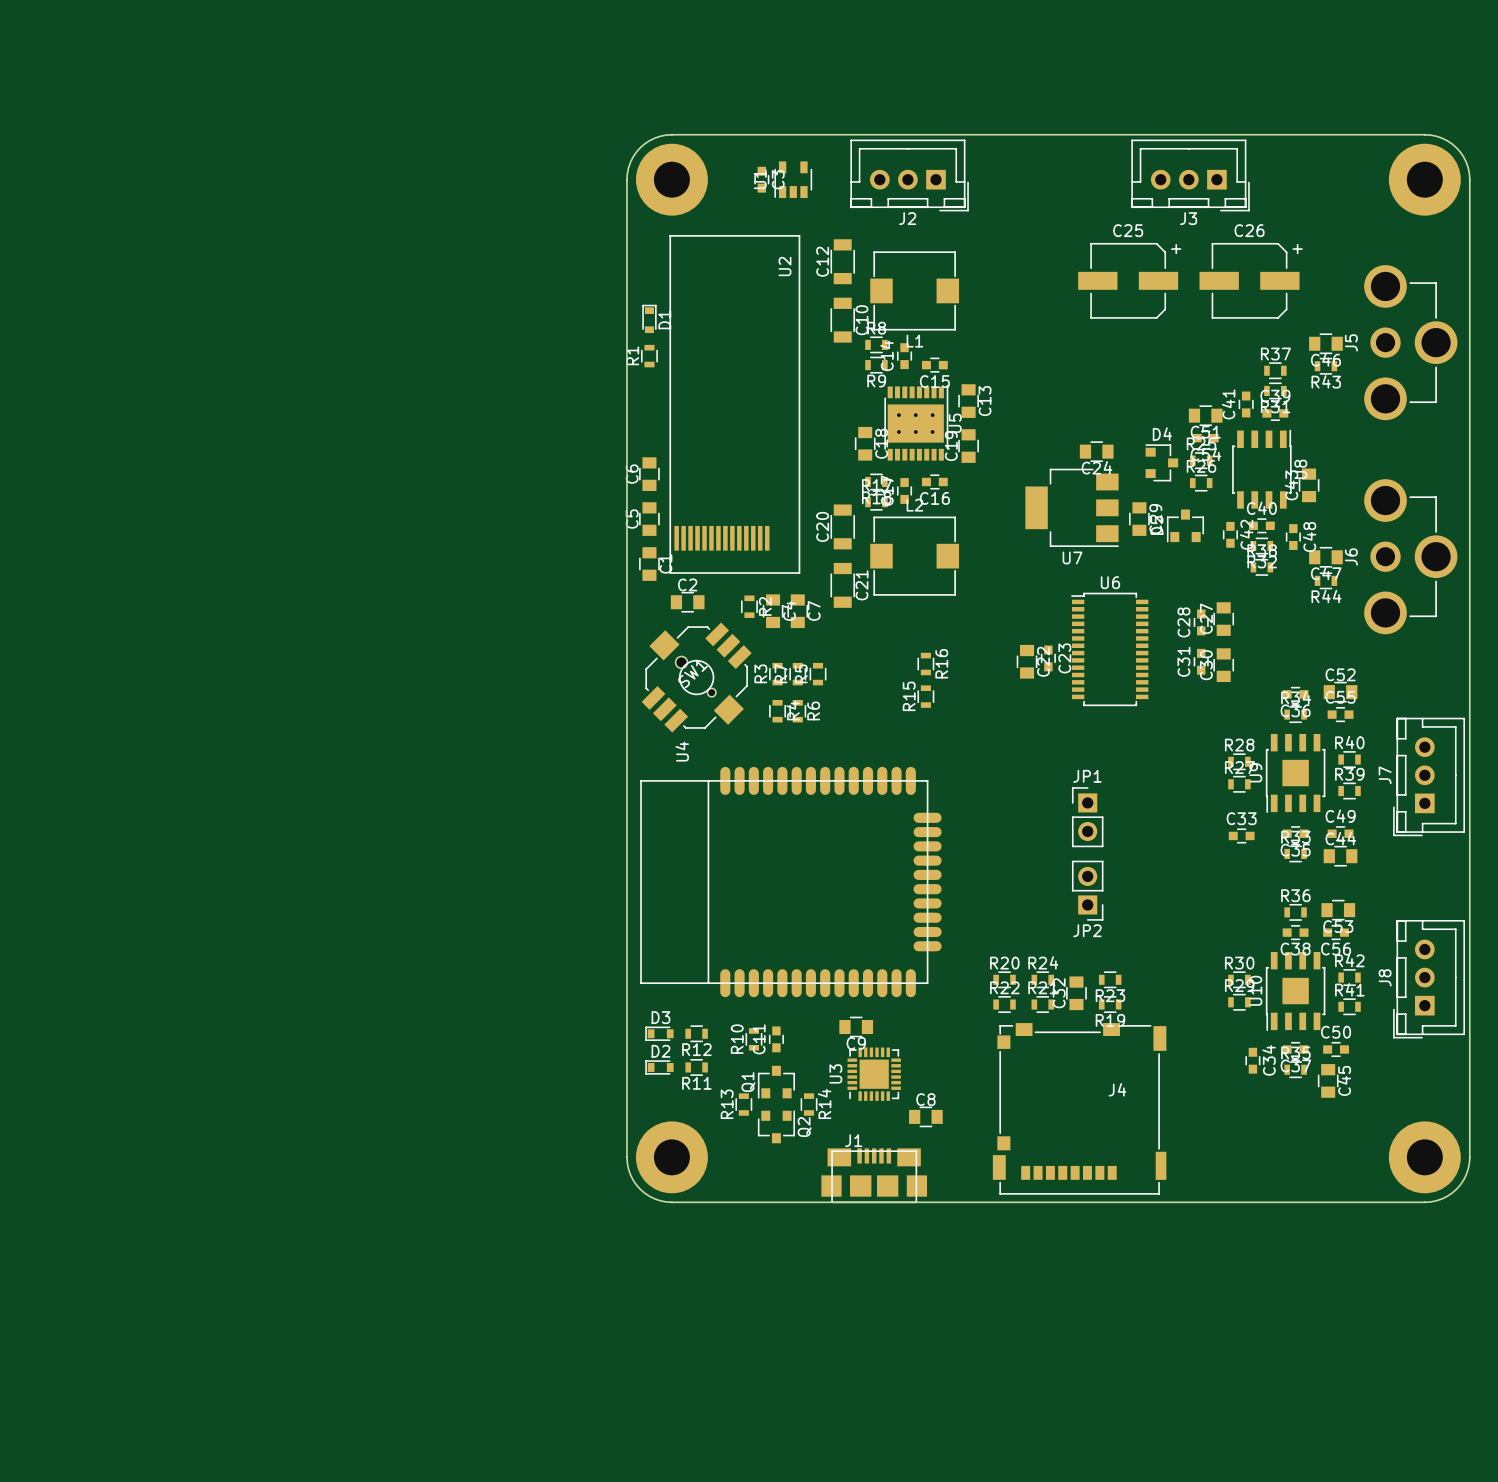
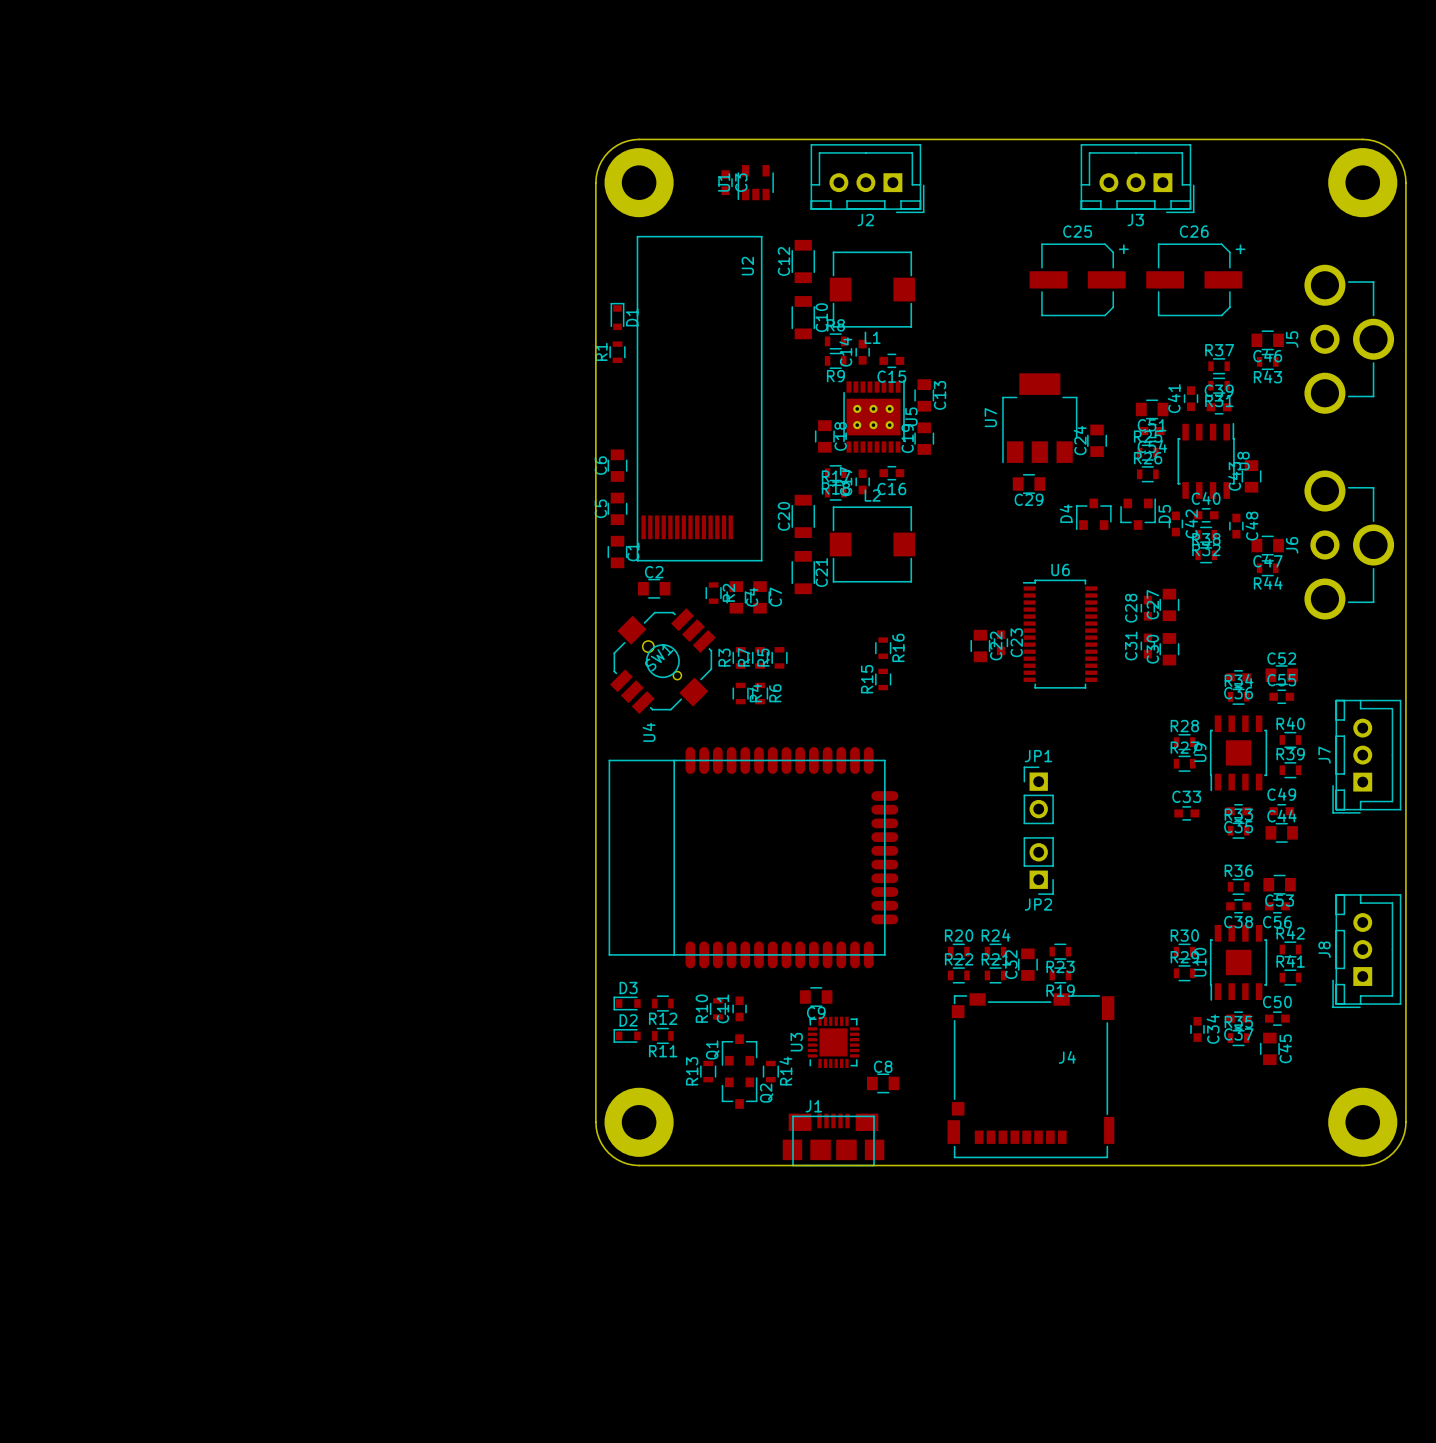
C24 rotation: 0° (1096, 451) -> 90° clockwise (1097, 440)
C24 position: (1096, 451) -> (1097, 440)
D4 rotation: 0° (1161, 462) -> 90° counterclockwise (1093, 514)
D4 position: (1161, 462) -> (1093, 514)
U7 rotation: 0° (1072, 507) -> 90° clockwise (1039, 418)
U7 position: (1072, 507) -> (1039, 418)
C29 rotation: 0° (1139, 519) -> 90° clockwise (1029, 483)
C29 position: (1139, 519) -> (1029, 483)
D5 rotation: 0° (1185, 525) -> 180° (1138, 514)

